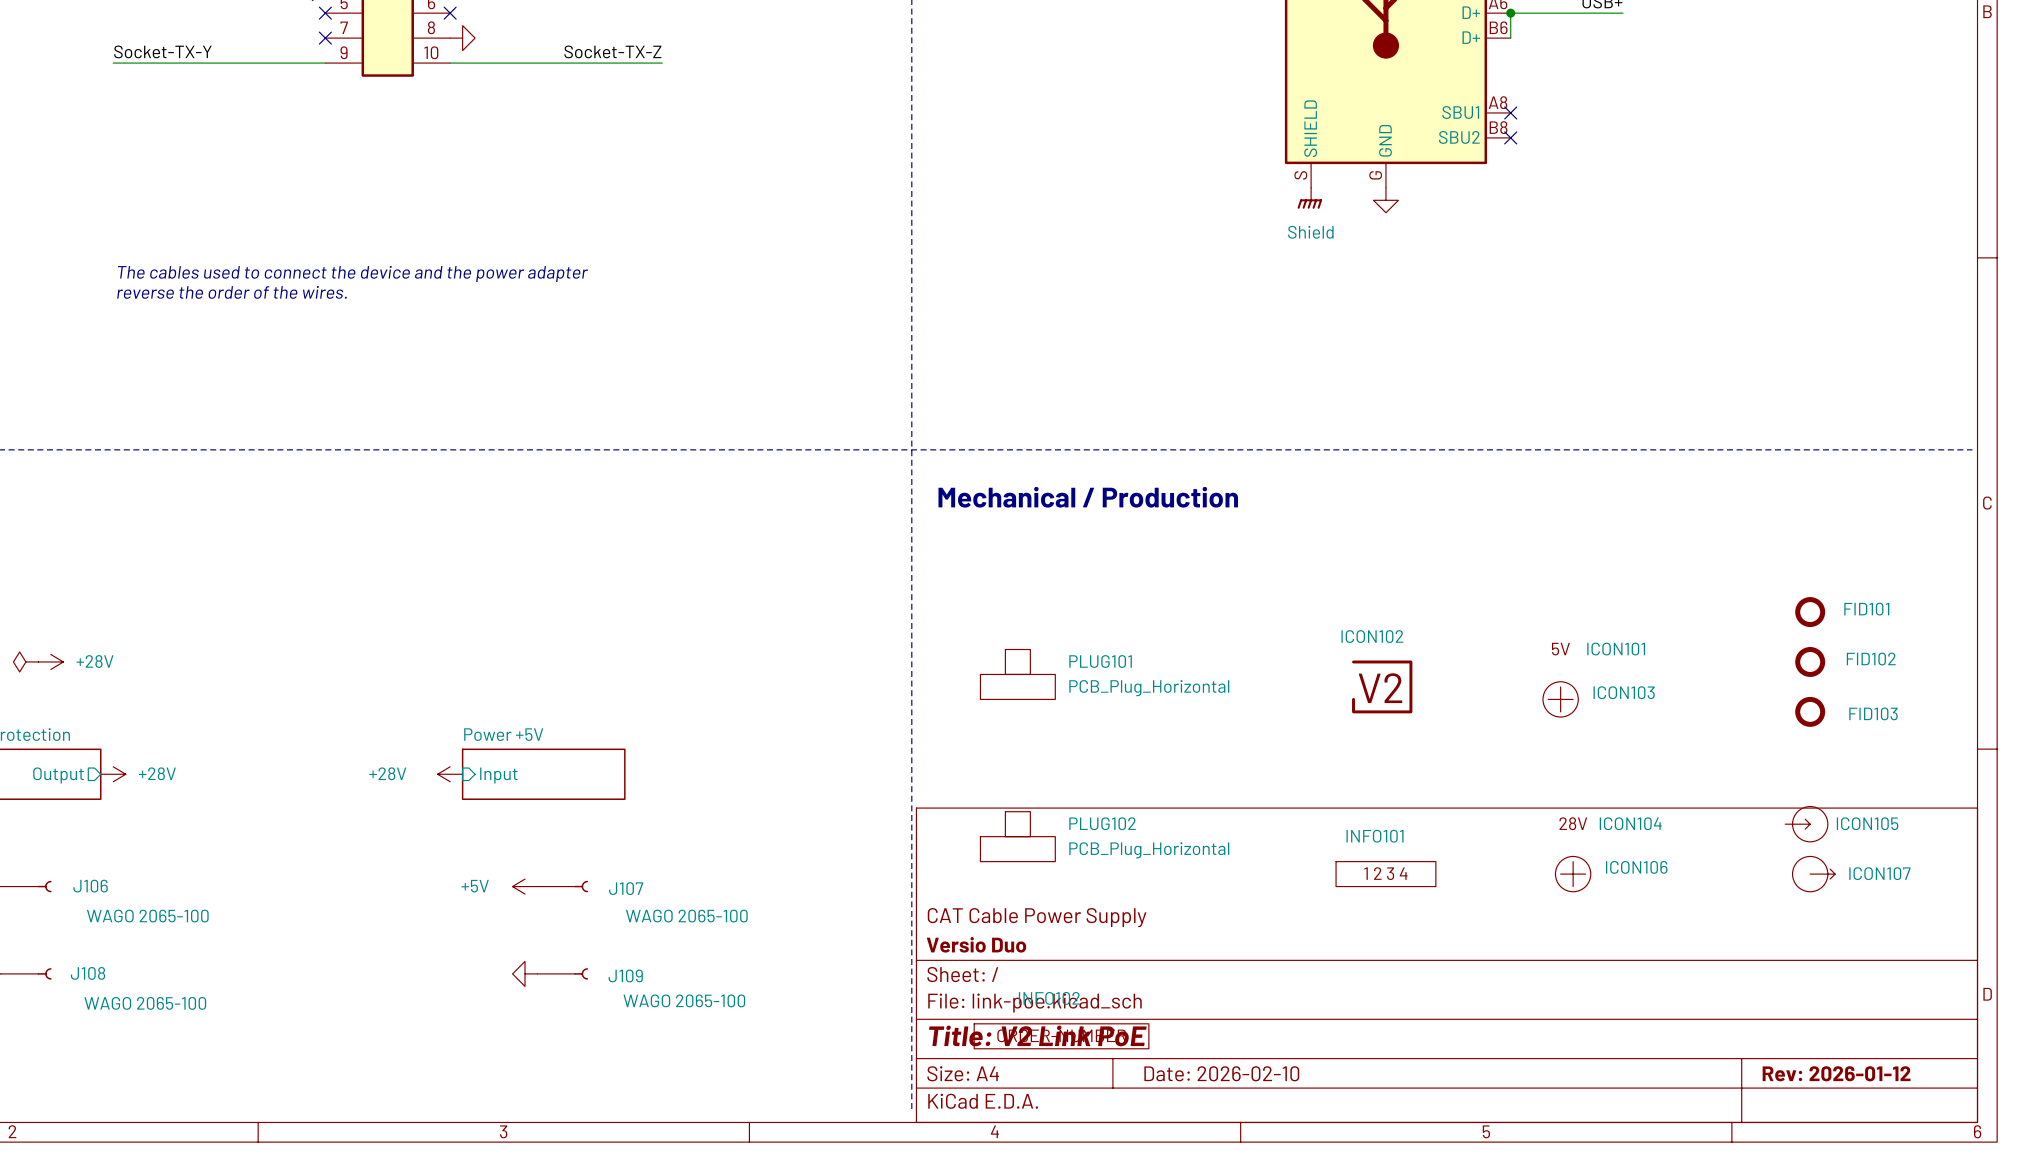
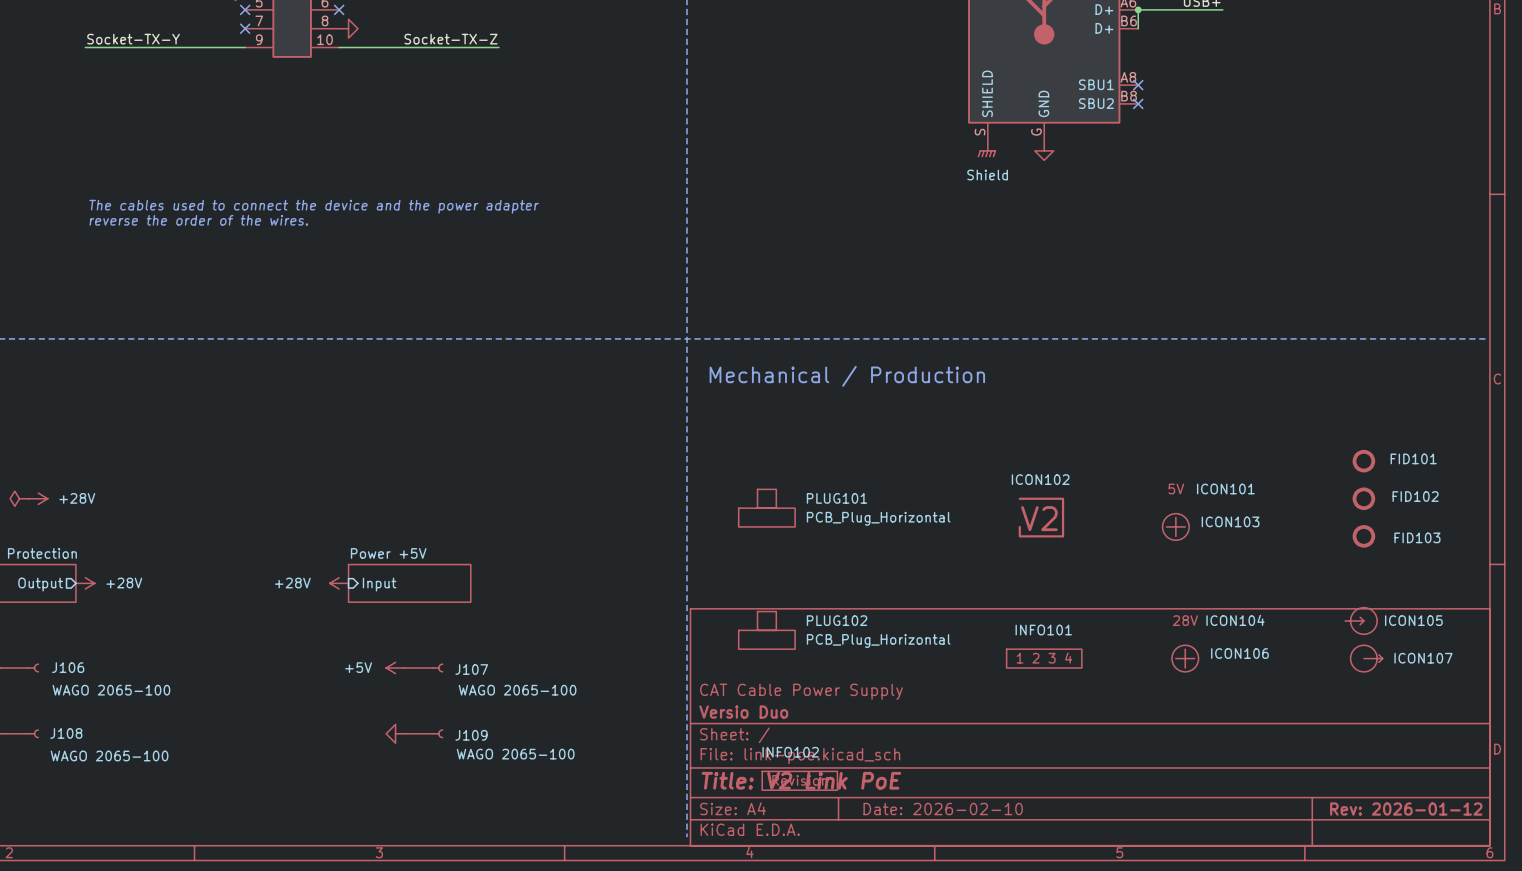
INFO102 symbol: [974, 1023, 1149, 1049] -> [762, 771, 838, 791]

